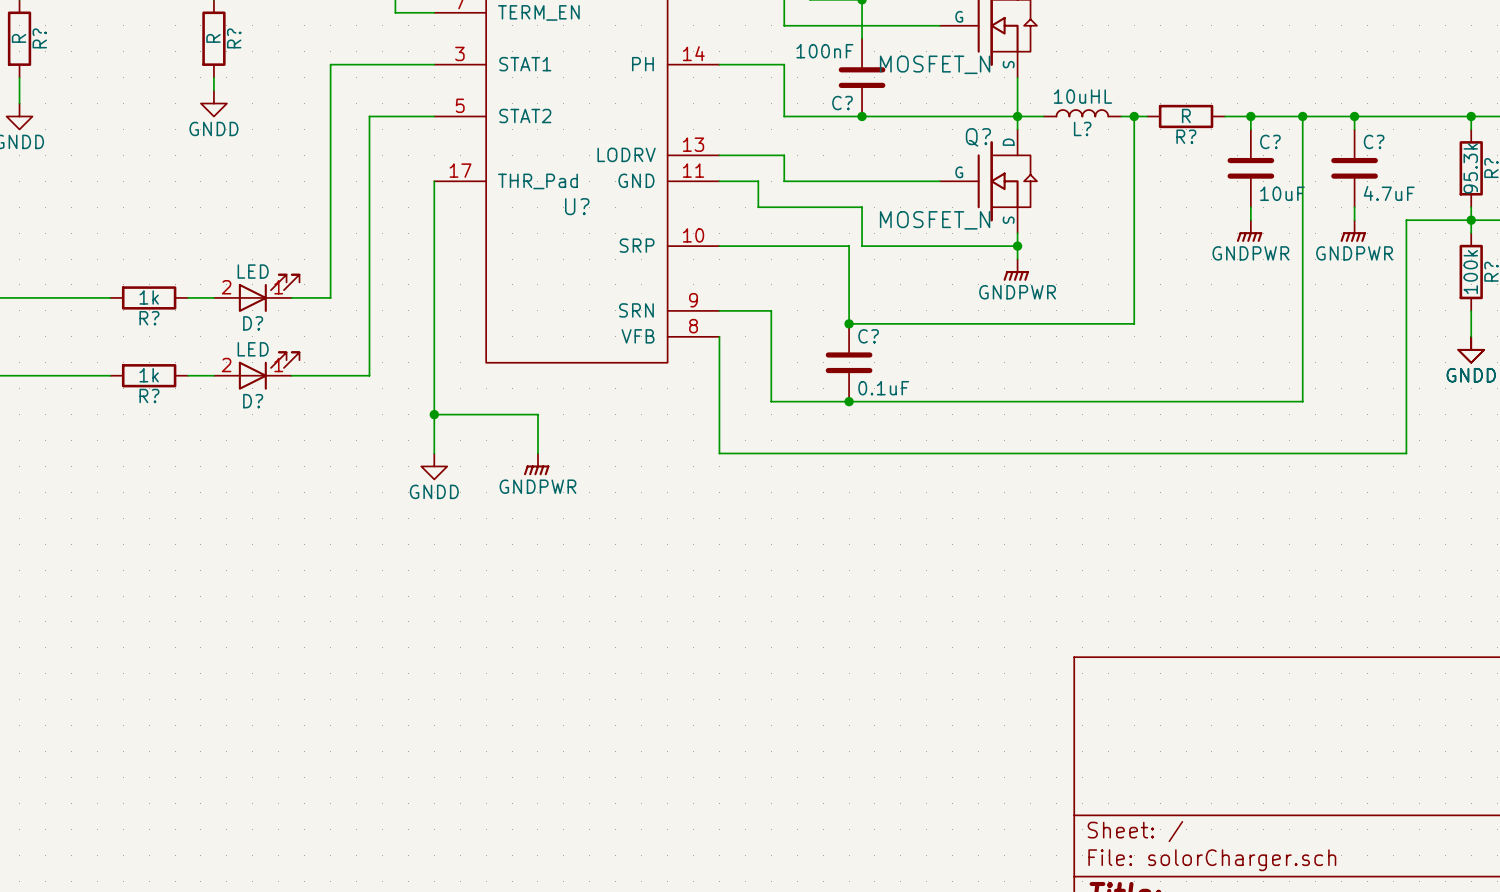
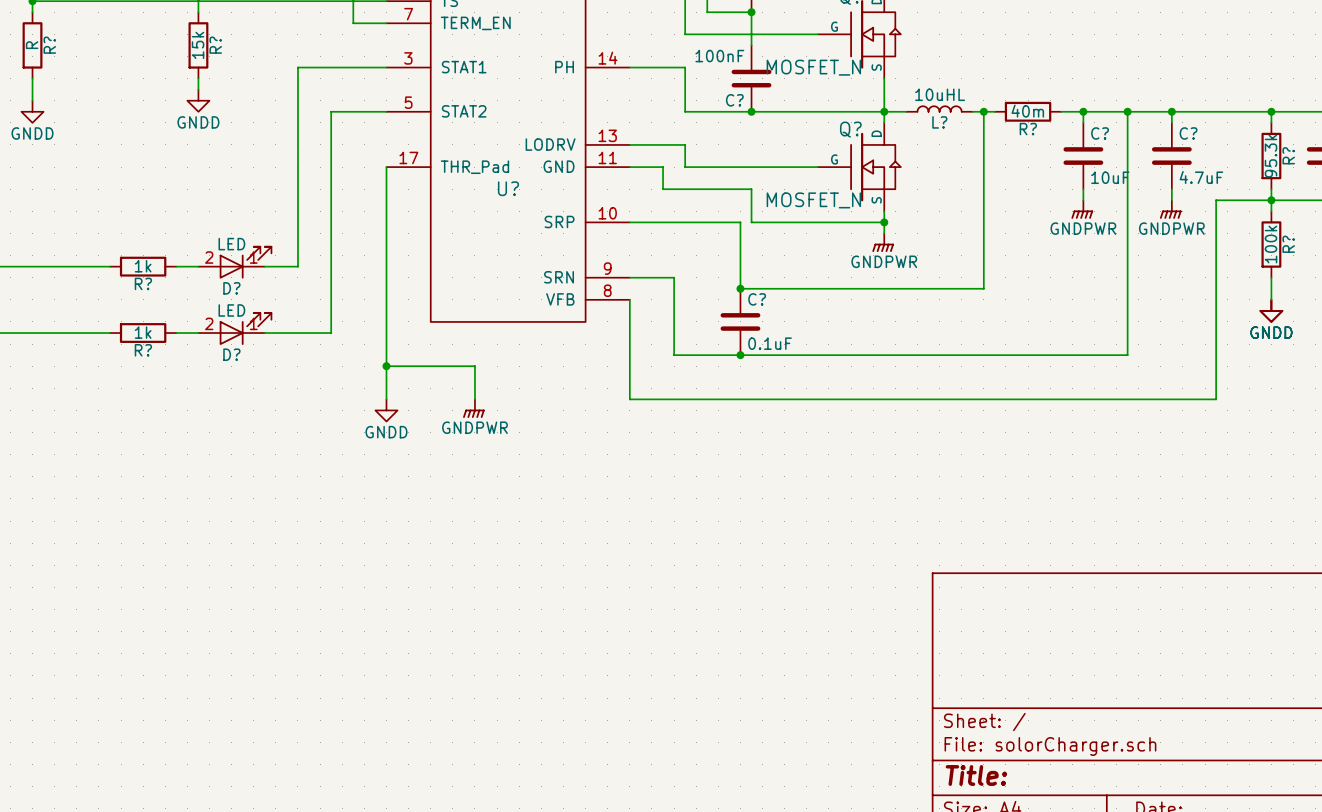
R? value: R (213, 38) -> 15k (198, 45)
R? value: R (1186, 116) -> 40m (1027, 111)

